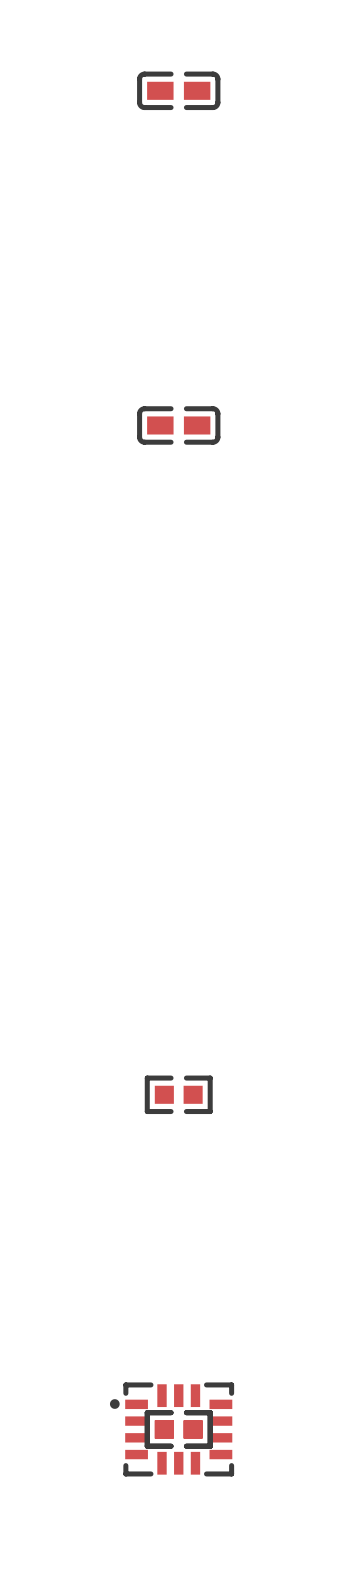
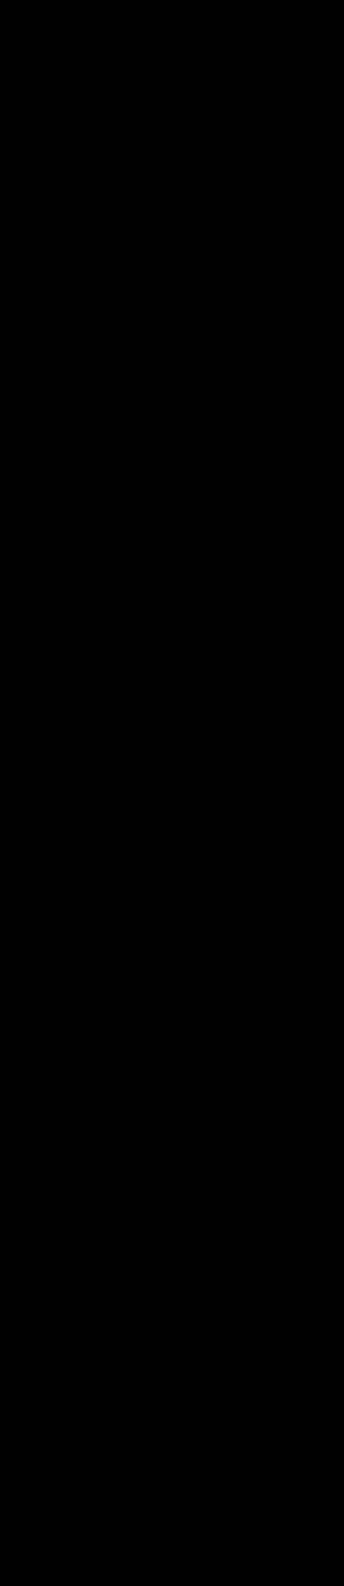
part: (178, 90) -> none
part: (178, 425) -> none
part: (178, 1094) -> none
part: (172, 1429) -> none
part: (178, 1429) -> none

